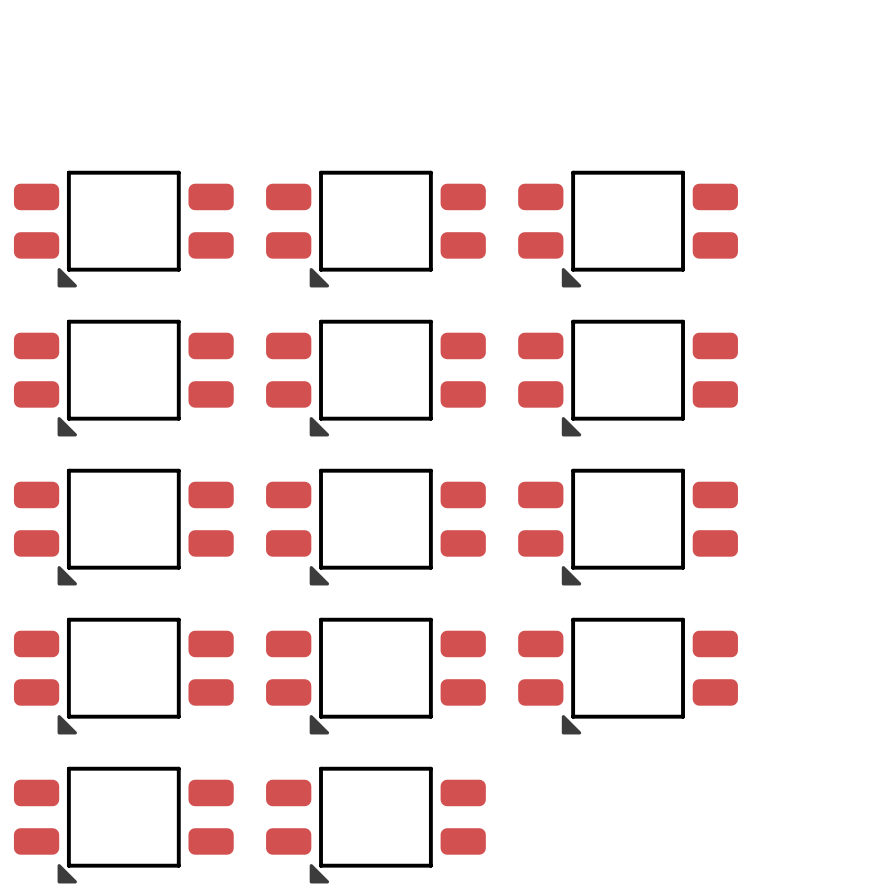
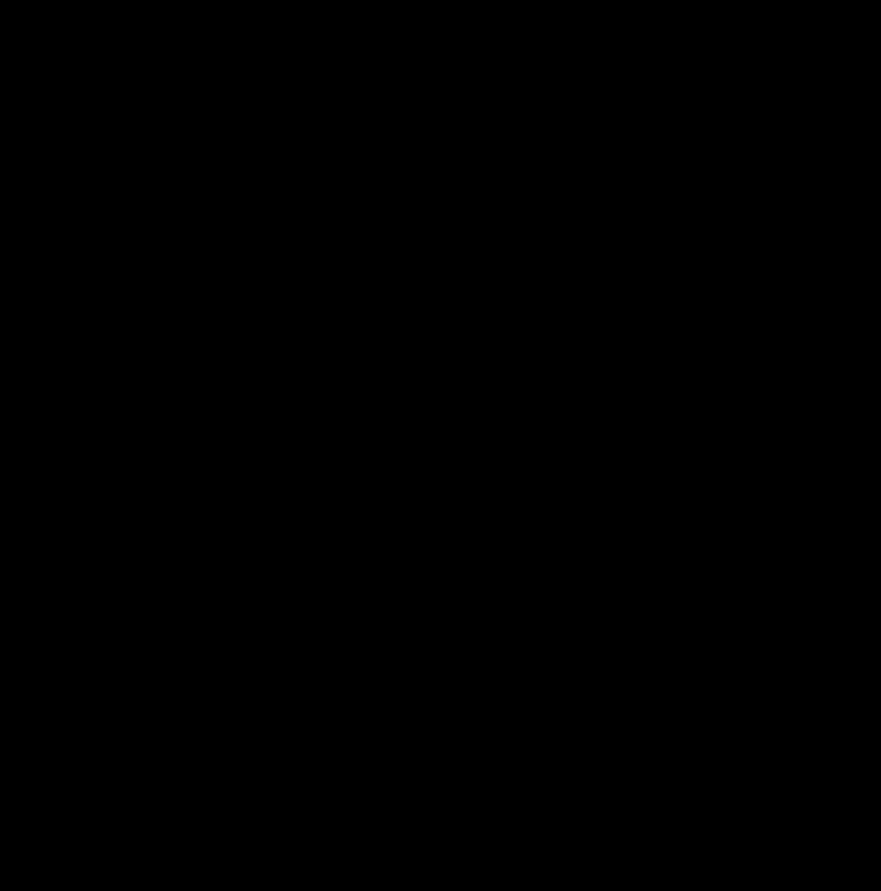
part: (123, 229) -> none
part: (375, 229) -> none
part: (628, 229) -> none
part: (123, 378) -> none
part: (375, 378) -> none
part: (628, 378) -> none
part: (123, 527) -> none
part: (375, 527) -> none
part: (628, 527) -> none
part: (123, 676) -> none
part: (375, 676) -> none
part: (628, 676) -> none
part: (123, 825) -> none
part: (375, 825) -> none

